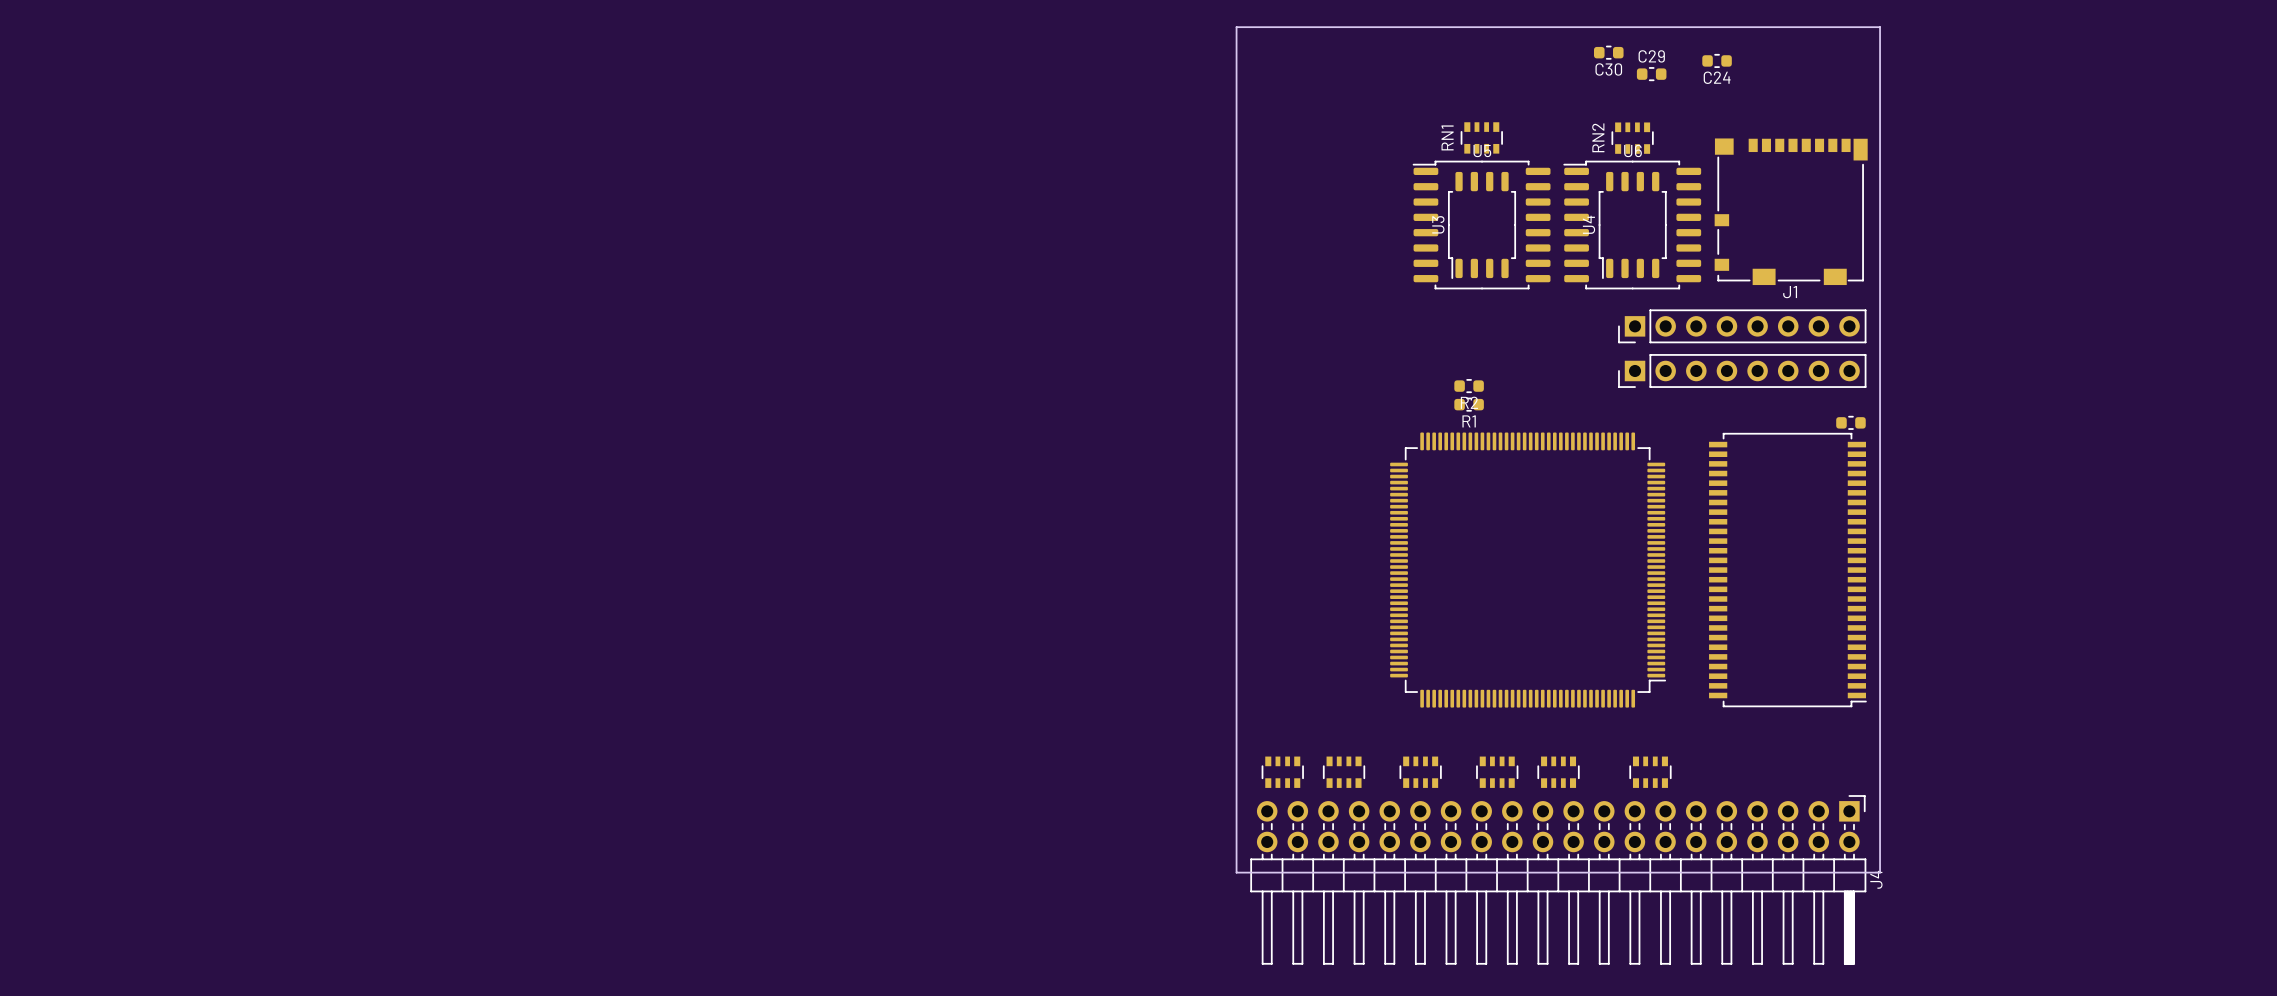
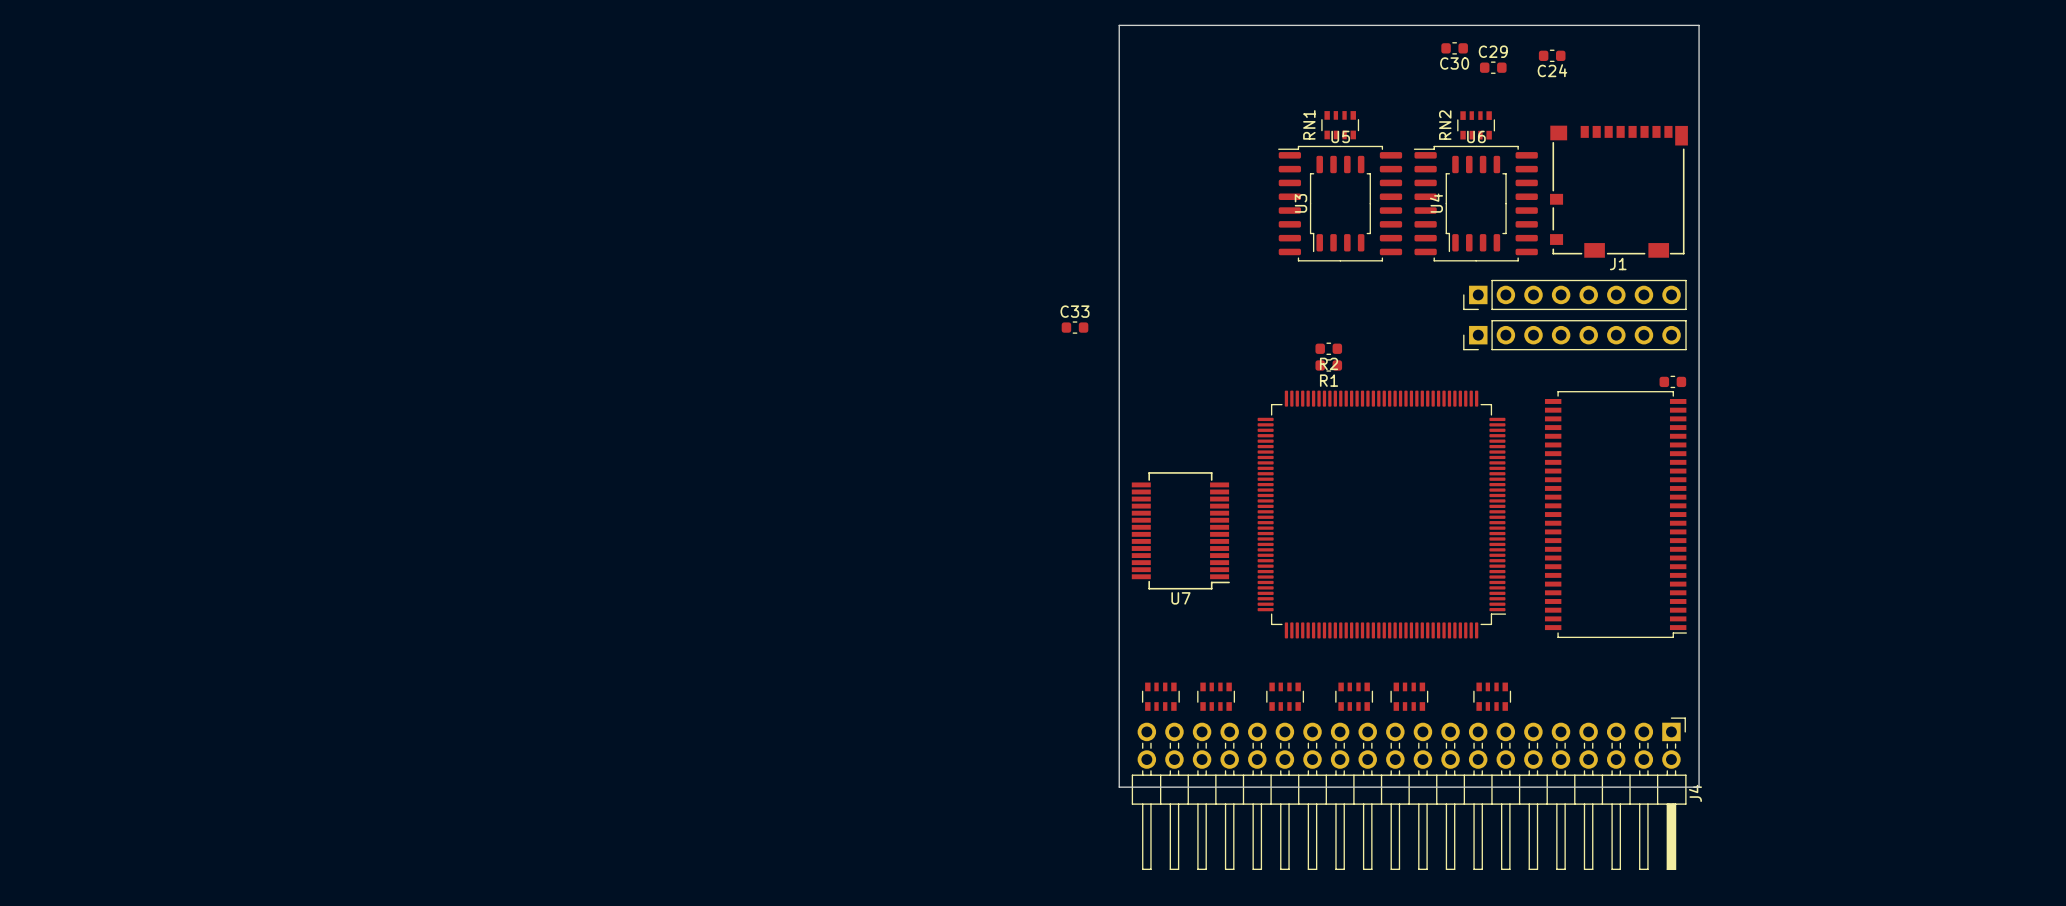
C33: none -> (1075, 327)
U7: none -> (1180, 530)

